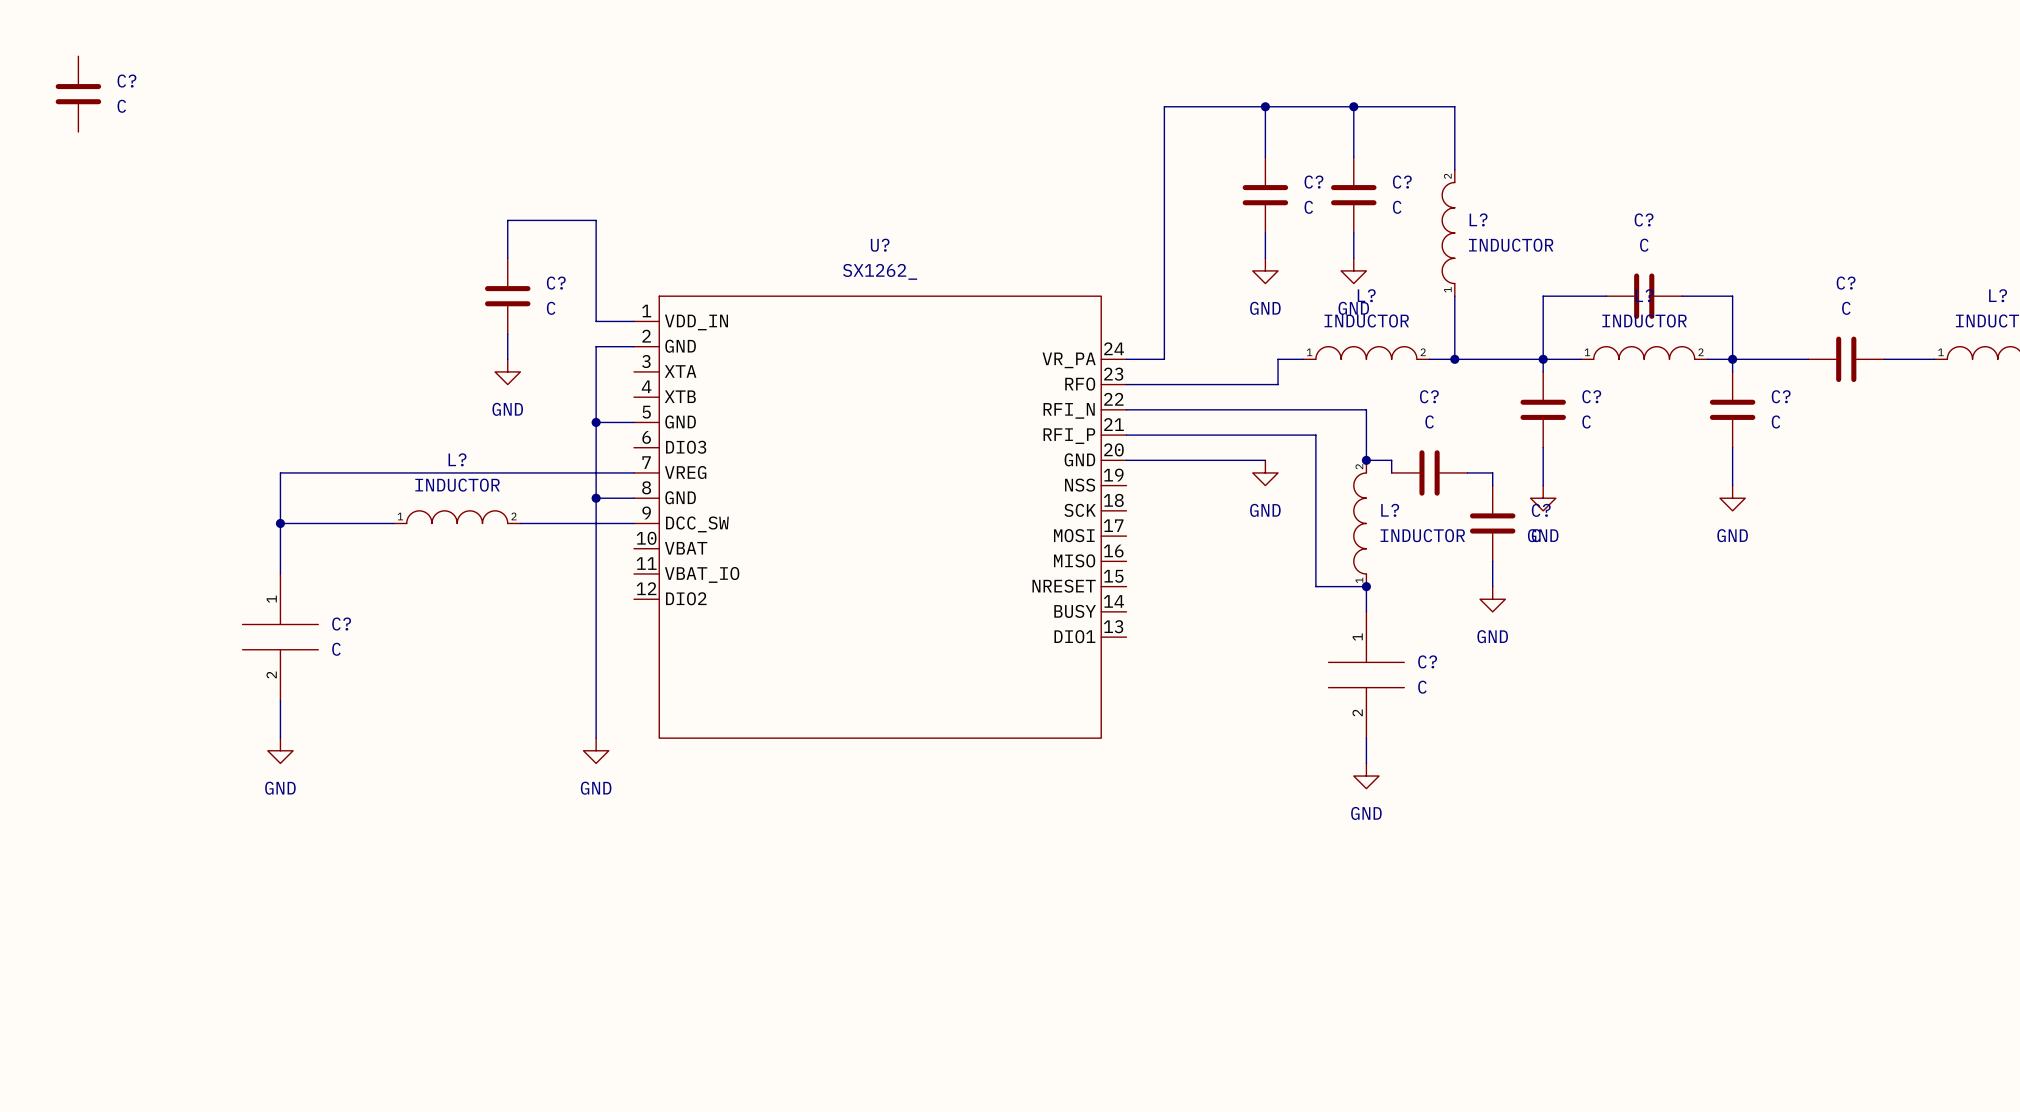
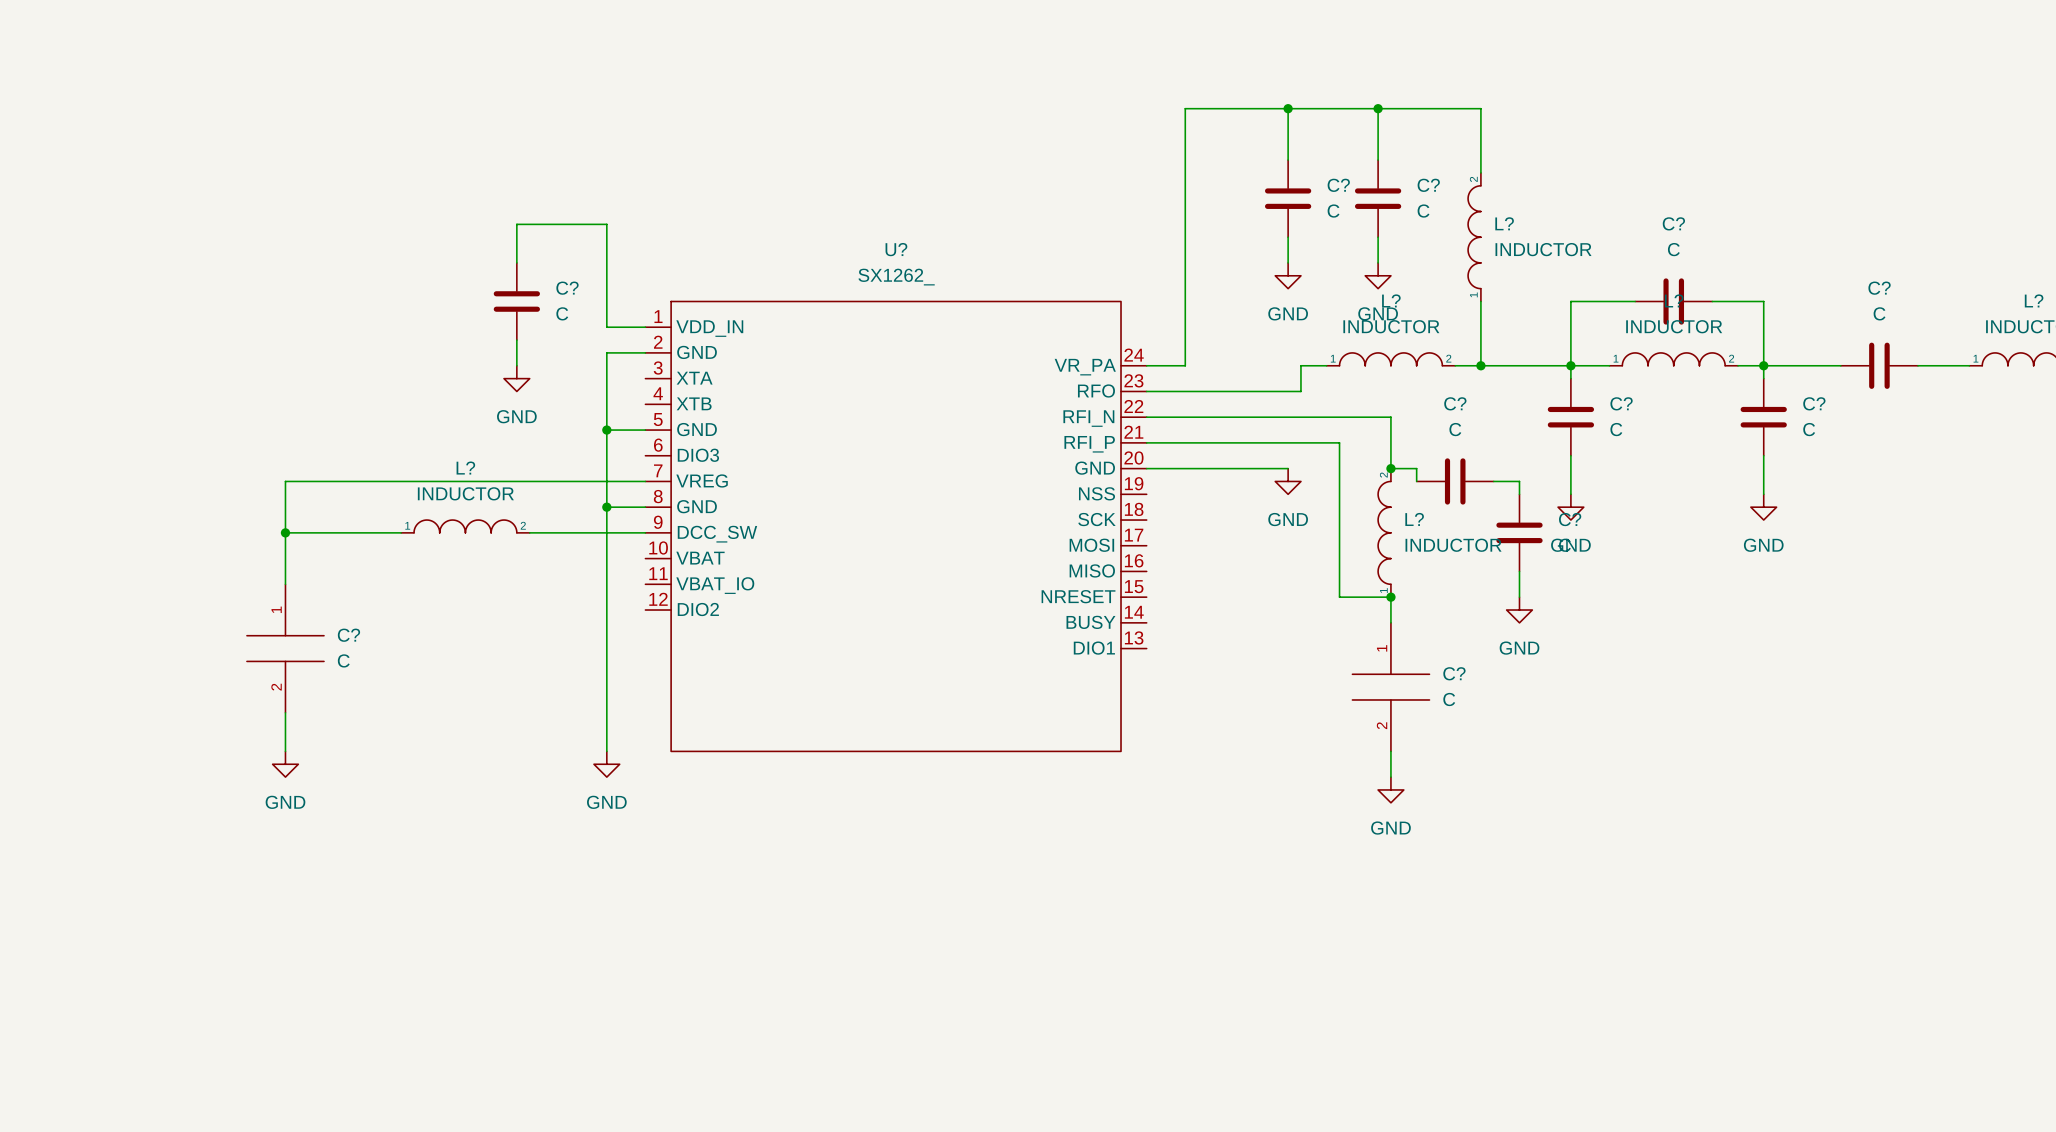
C?: C (78, 94) -> none

